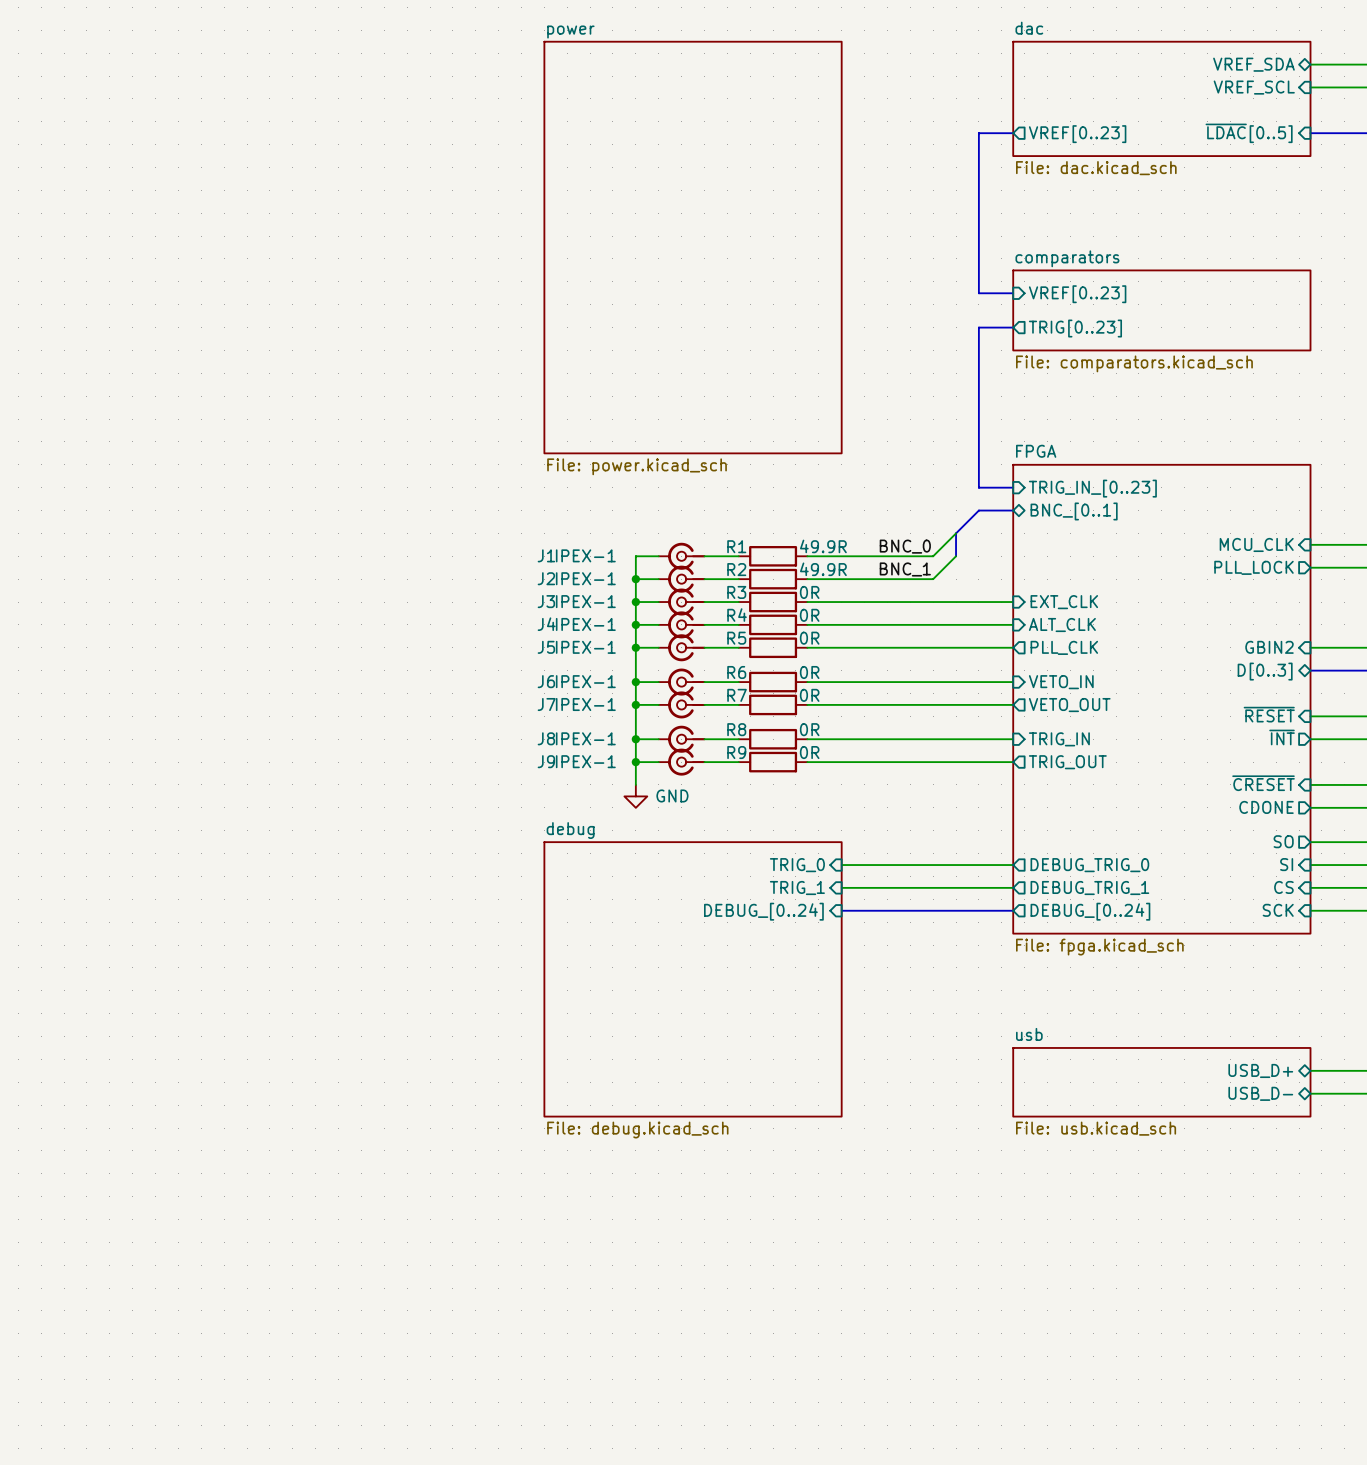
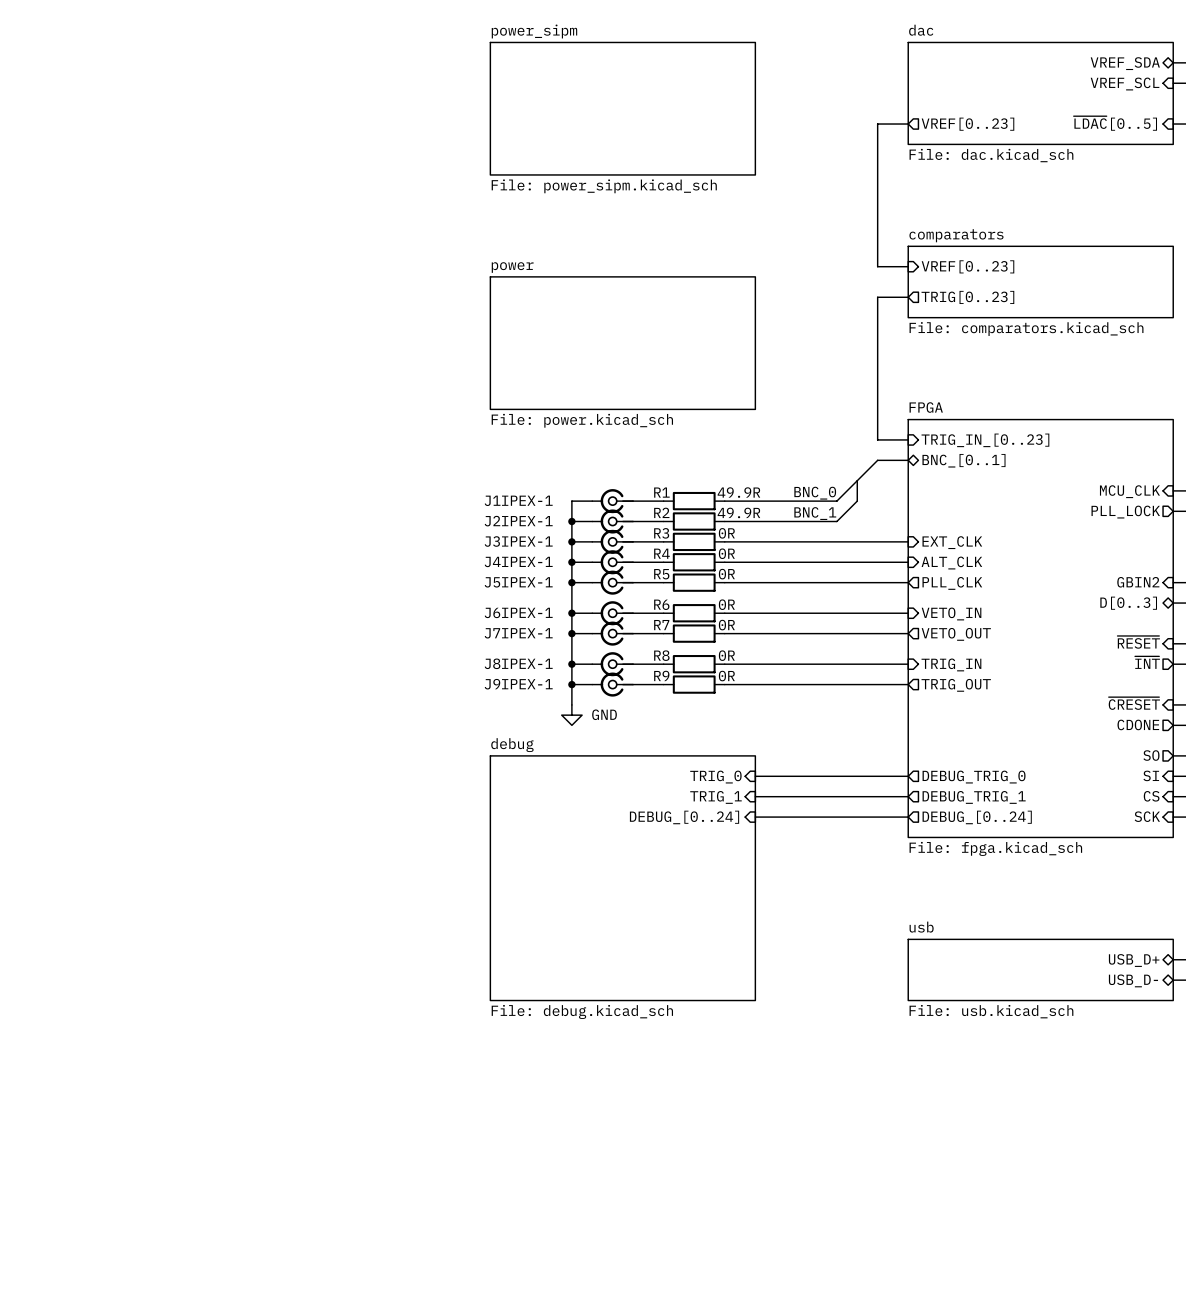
sheet power_sipm: none -> File: power_sipm.kicad_sch (622, 108)
sheet power: File: power.kicad_sch (693, 247) -> none
sheet power: none -> File: power.kicad_sch (622, 343)

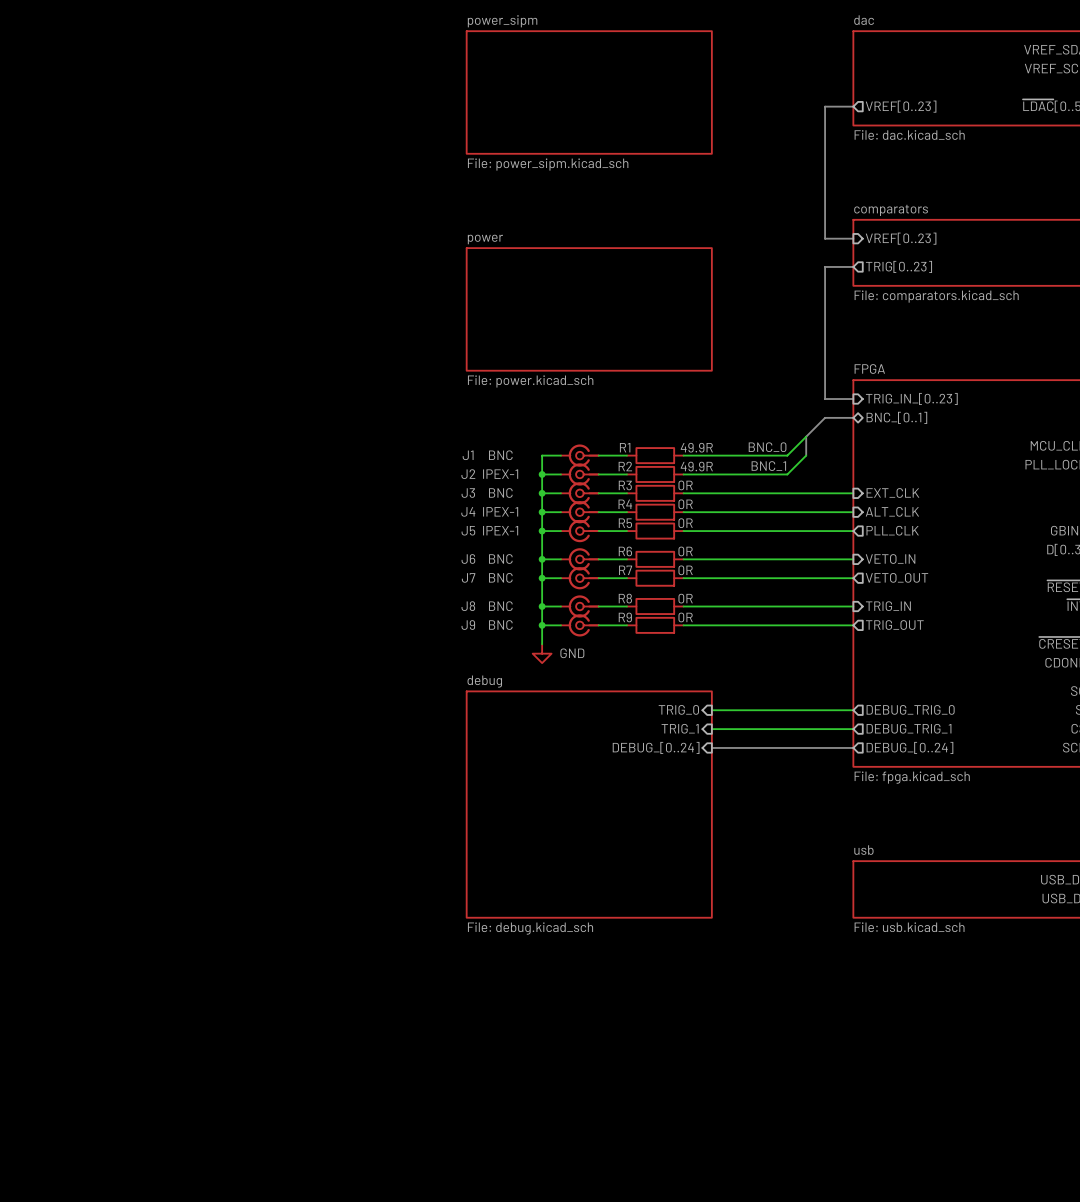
J1 value: IPEX-1 (527, 500) -> BNC (500, 455)
J3 value: IPEX-1 (527, 541) -> BNC (500, 492)
J6 value: IPEX-1 (527, 612) -> BNC (500, 559)
J7 value: IPEX-1 (527, 633) -> BNC (500, 577)
J8 value: IPEX-1 (527, 663) -> BNC (500, 606)
J9 value: IPEX-1 (527, 684) -> BNC (500, 625)

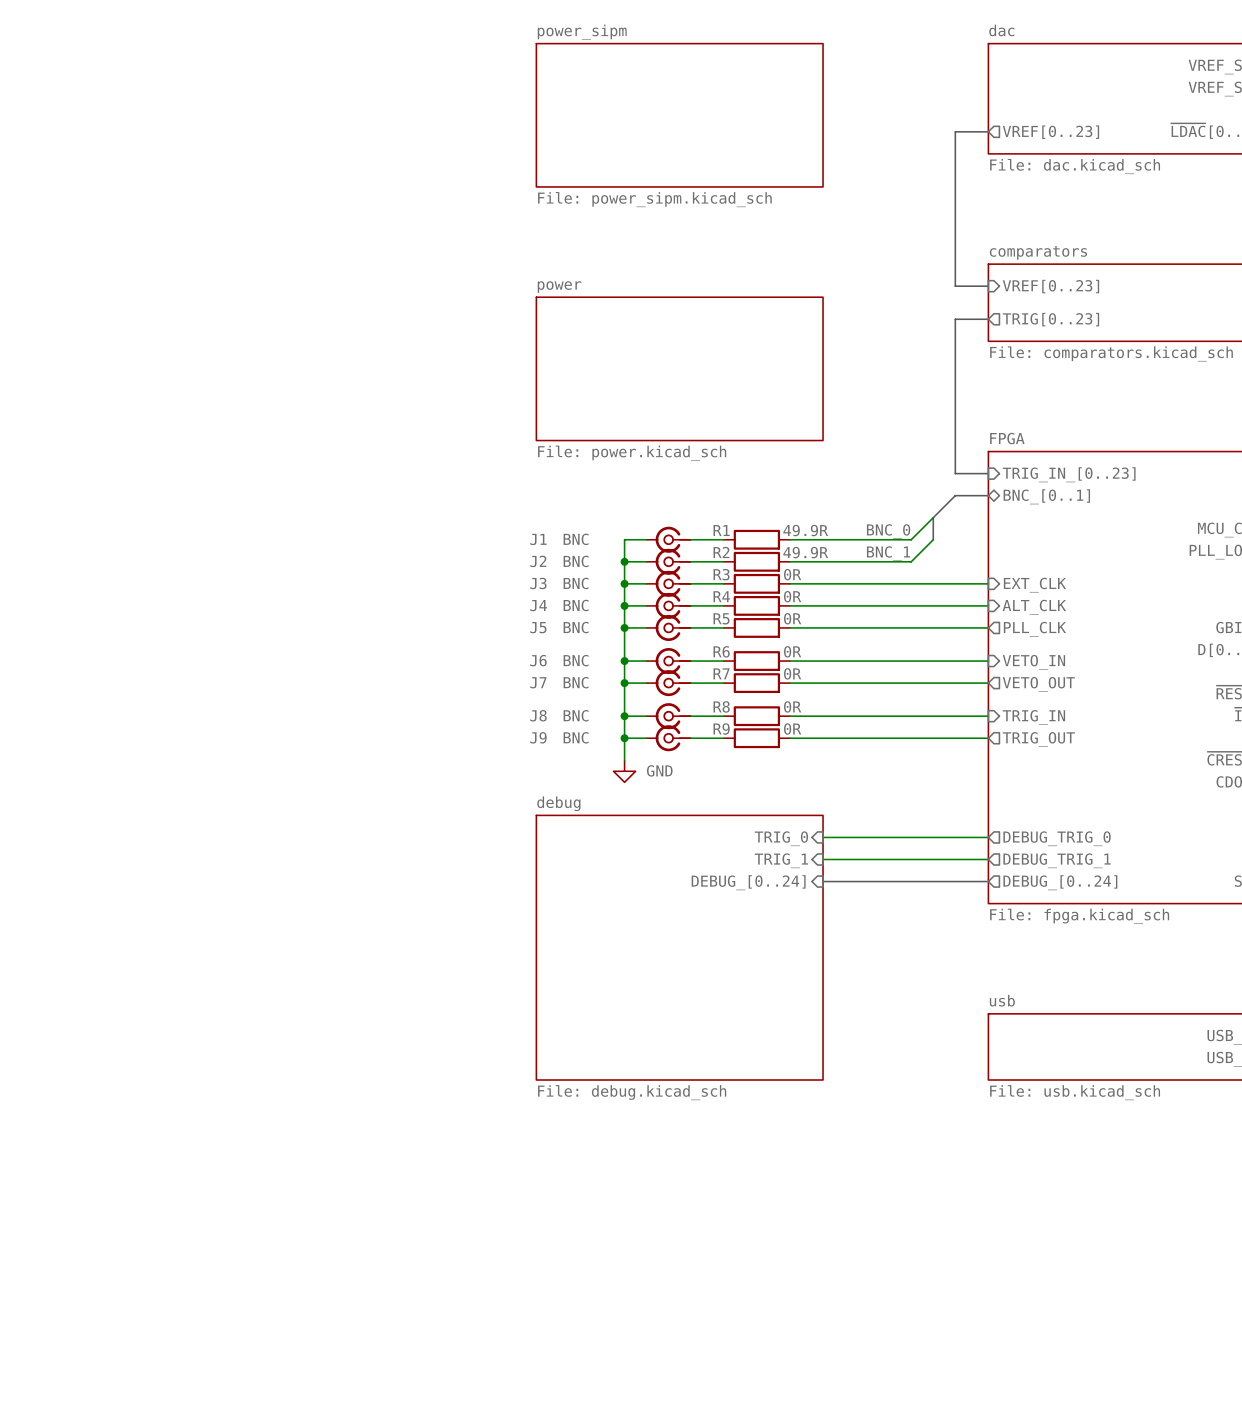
J2 value: IPEX-1 (500, 474) -> BNC (576, 561)
J4 value: IPEX-1 (500, 511) -> BNC (576, 605)
J5 value: IPEX-1 (500, 530) -> BNC (576, 627)

